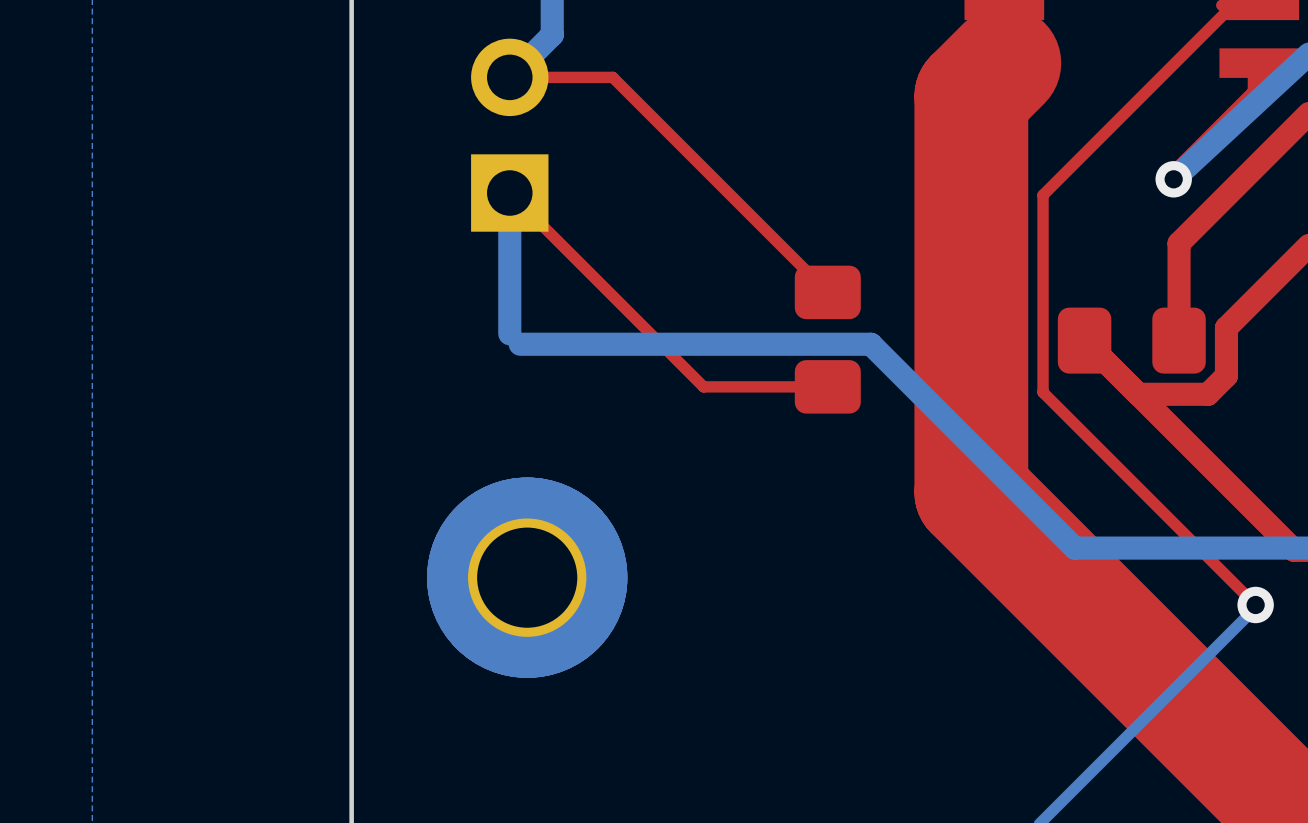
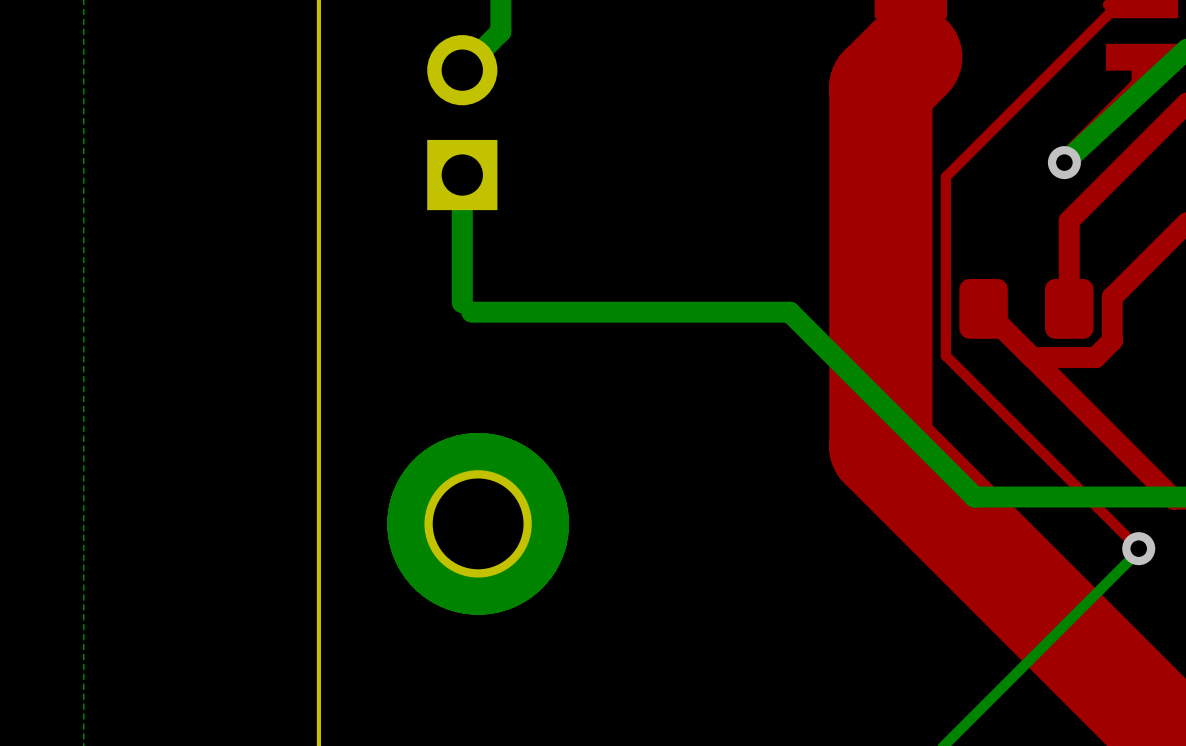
top track: (509, 77) (612, 77) (827, 292) -> none
top track: (509, 193) (703, 386) (827, 386) -> none
part: (827, 339) -> none

